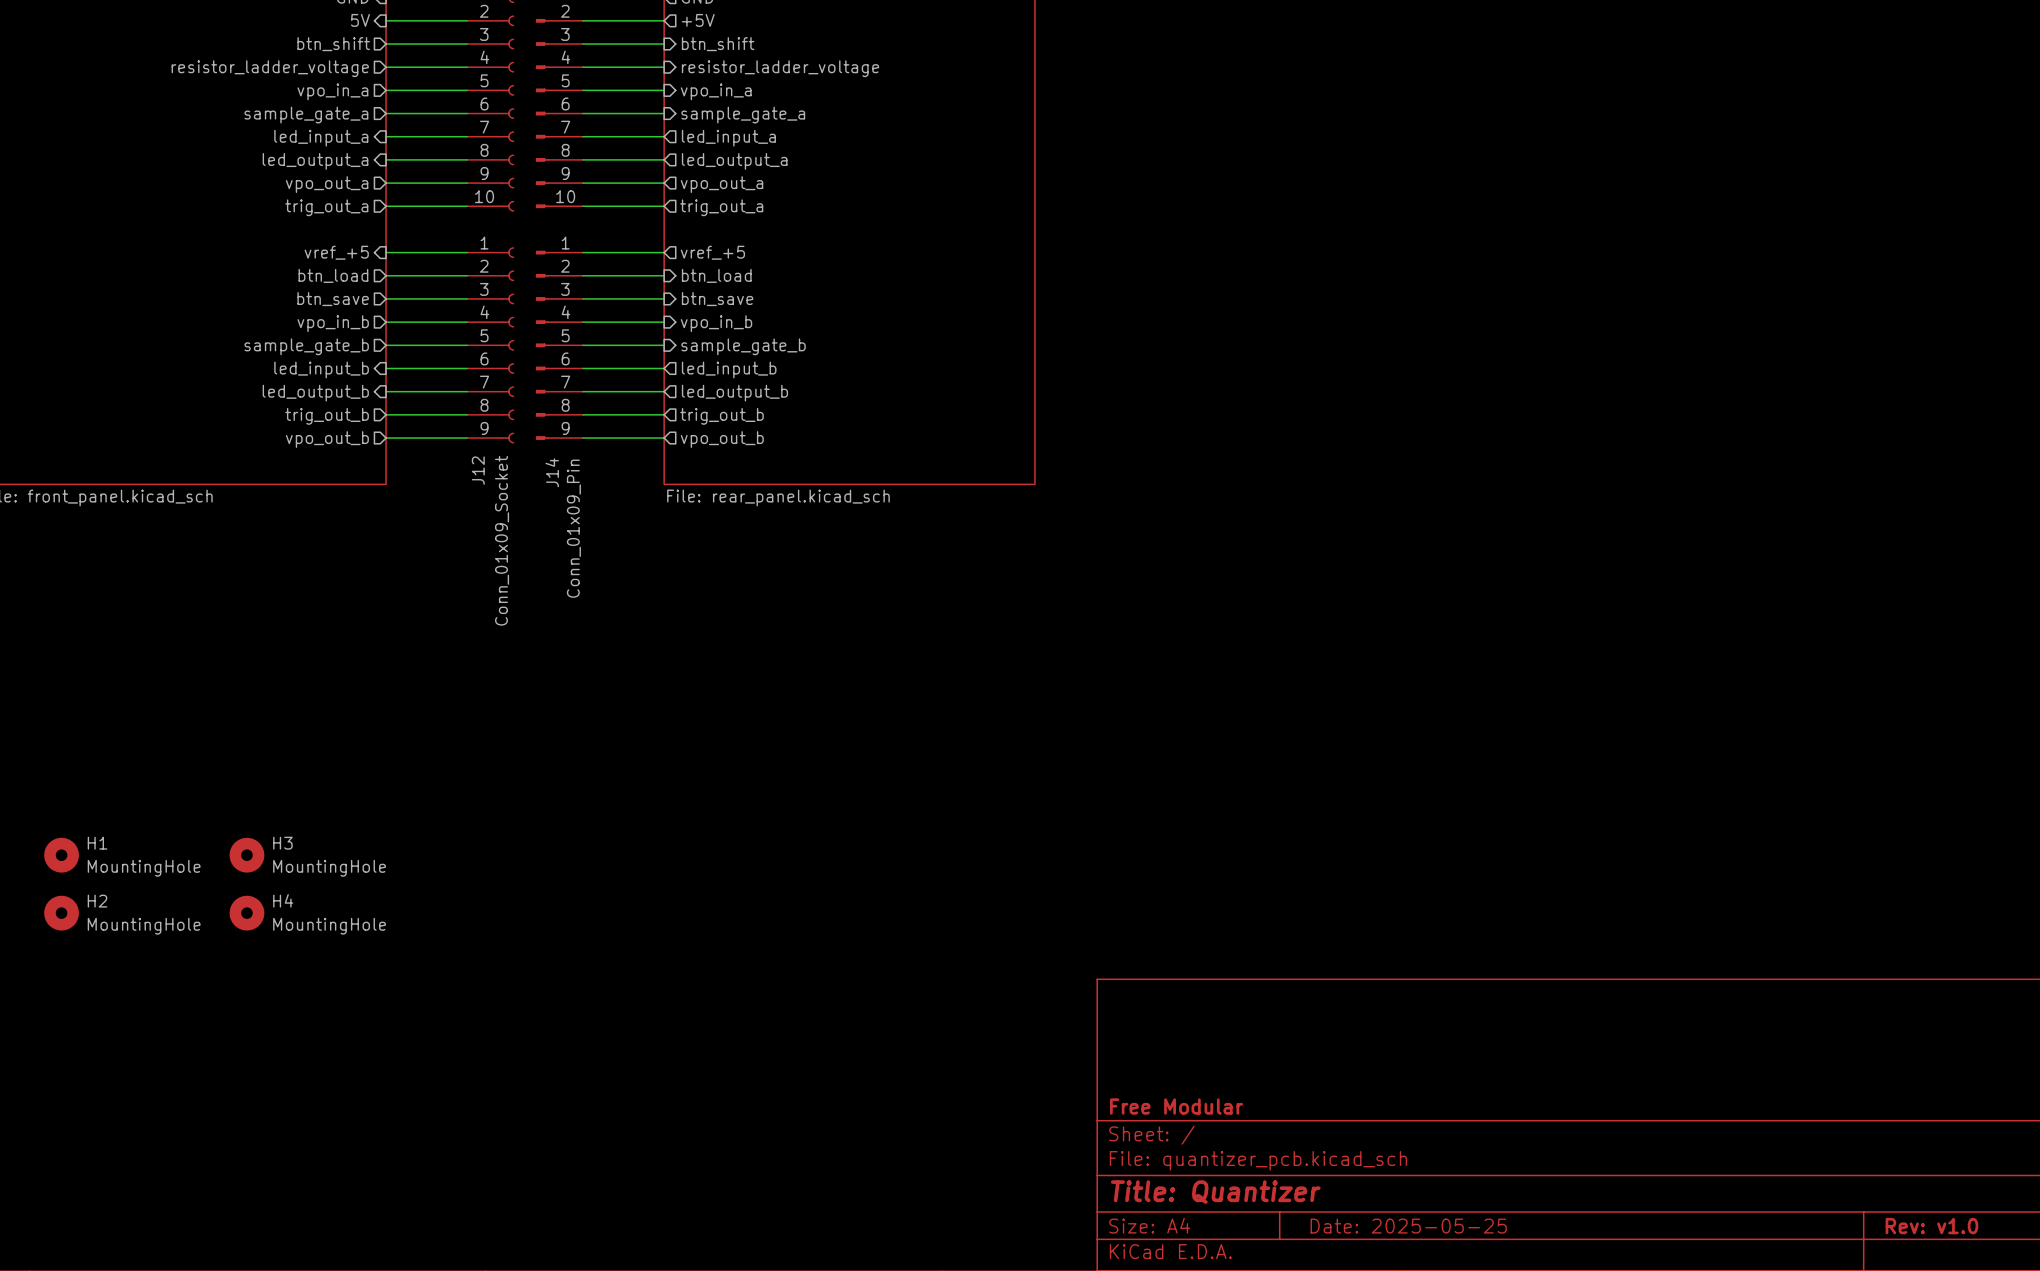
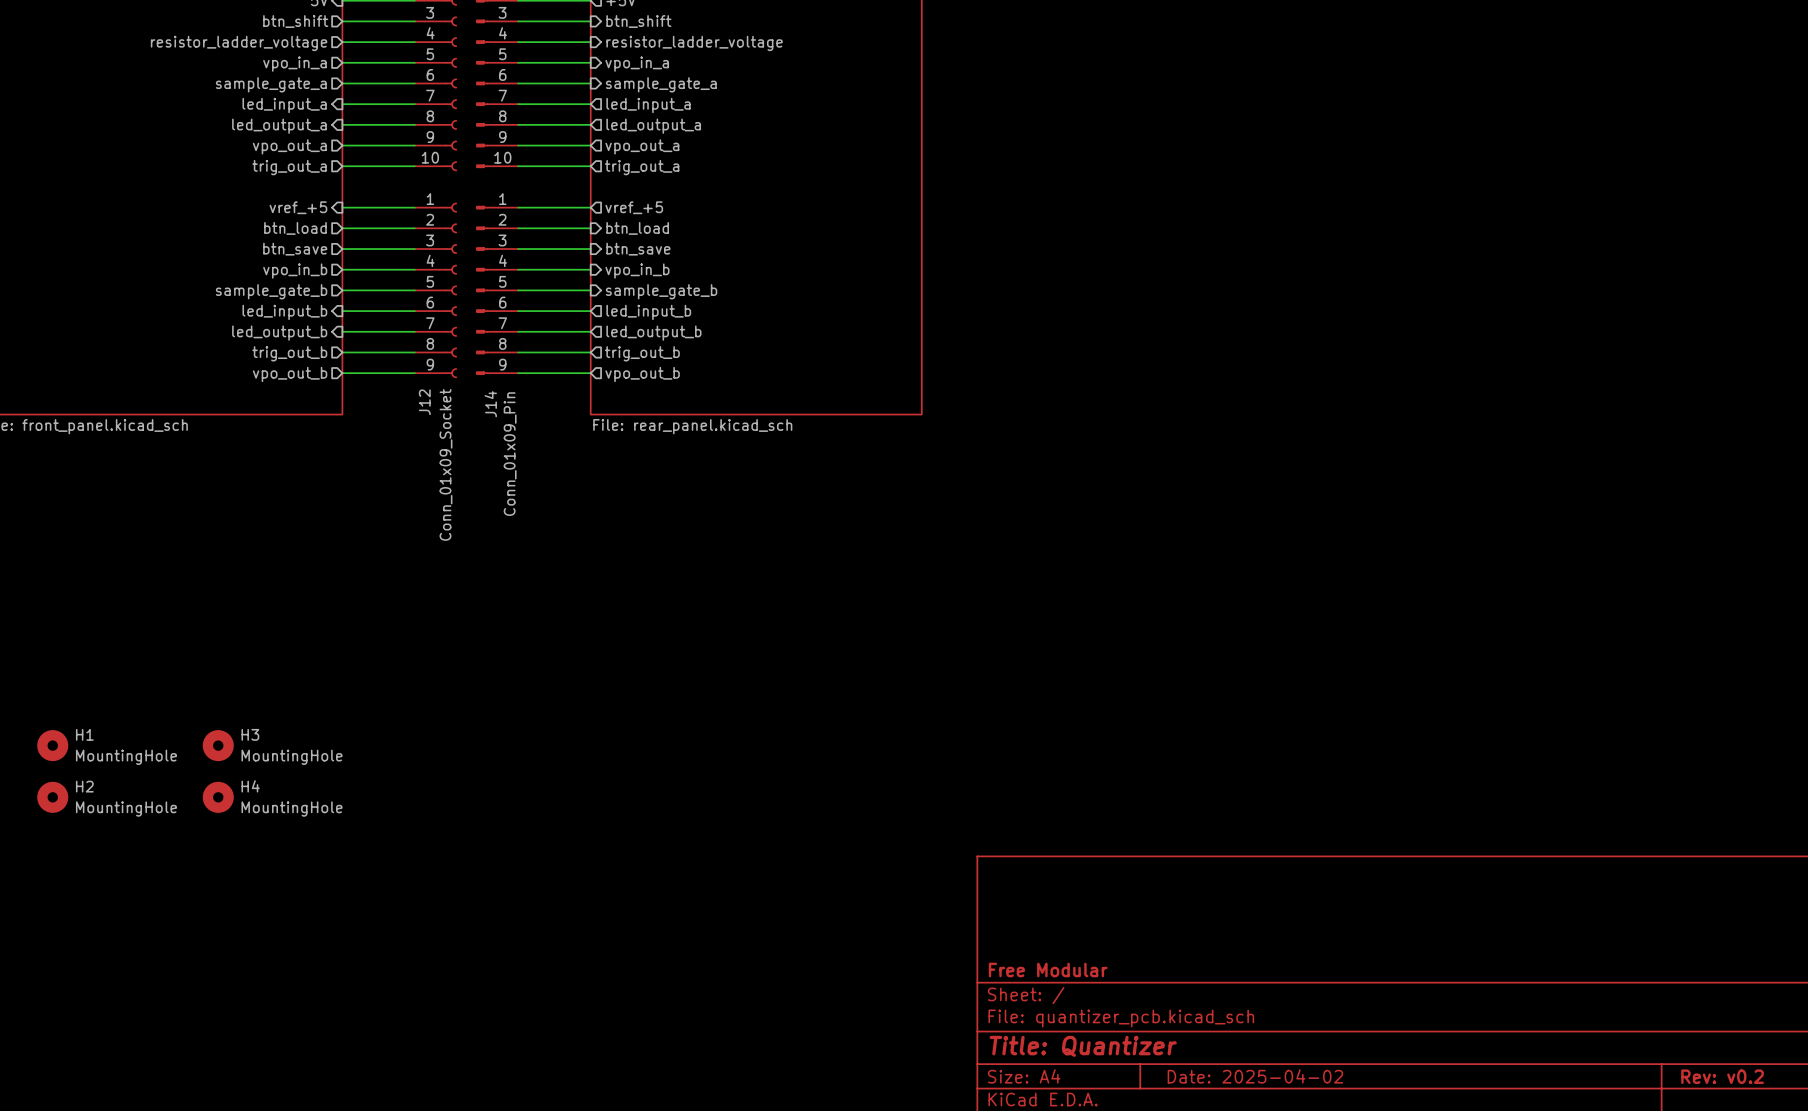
title block: Date: 2025-05-25 (1408, 1226) -> Date: 2025-04-02 (1255, 1076)
title block: Rev: v1.0 (1931, 1226) -> Rev: v0.2 (1722, 1076)

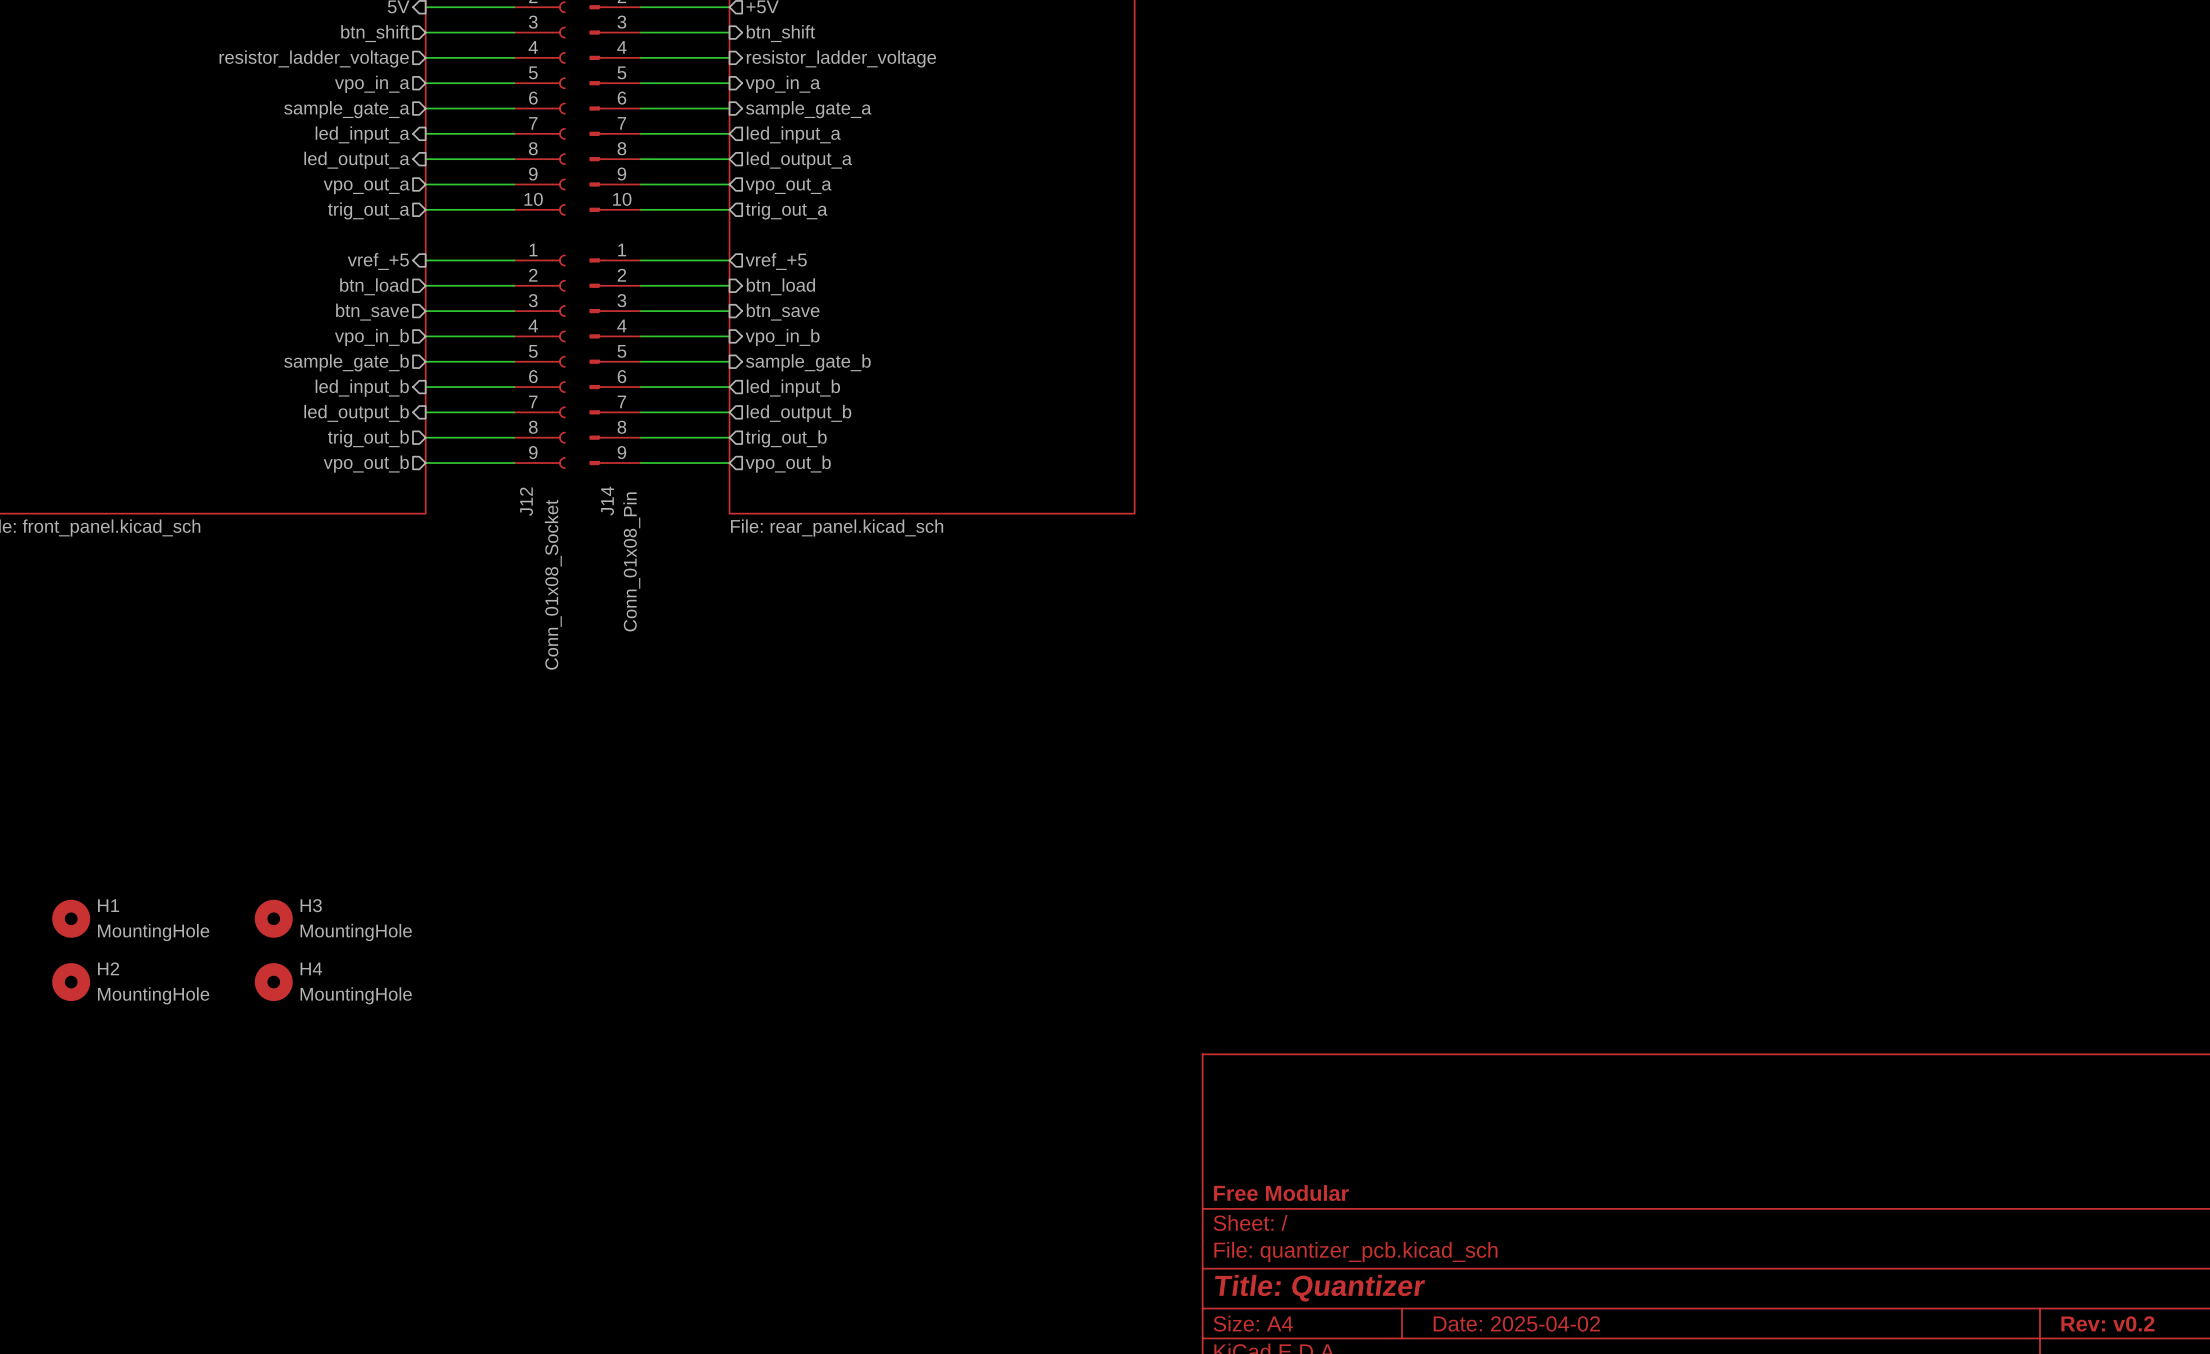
J14 value: Conn_01x09_Pin (510, 454) -> Conn_01x08_Pin (631, 561)
J12 value: Conn_01x09_Socket (445, 464) -> Conn_01x08_Socket (553, 584)

